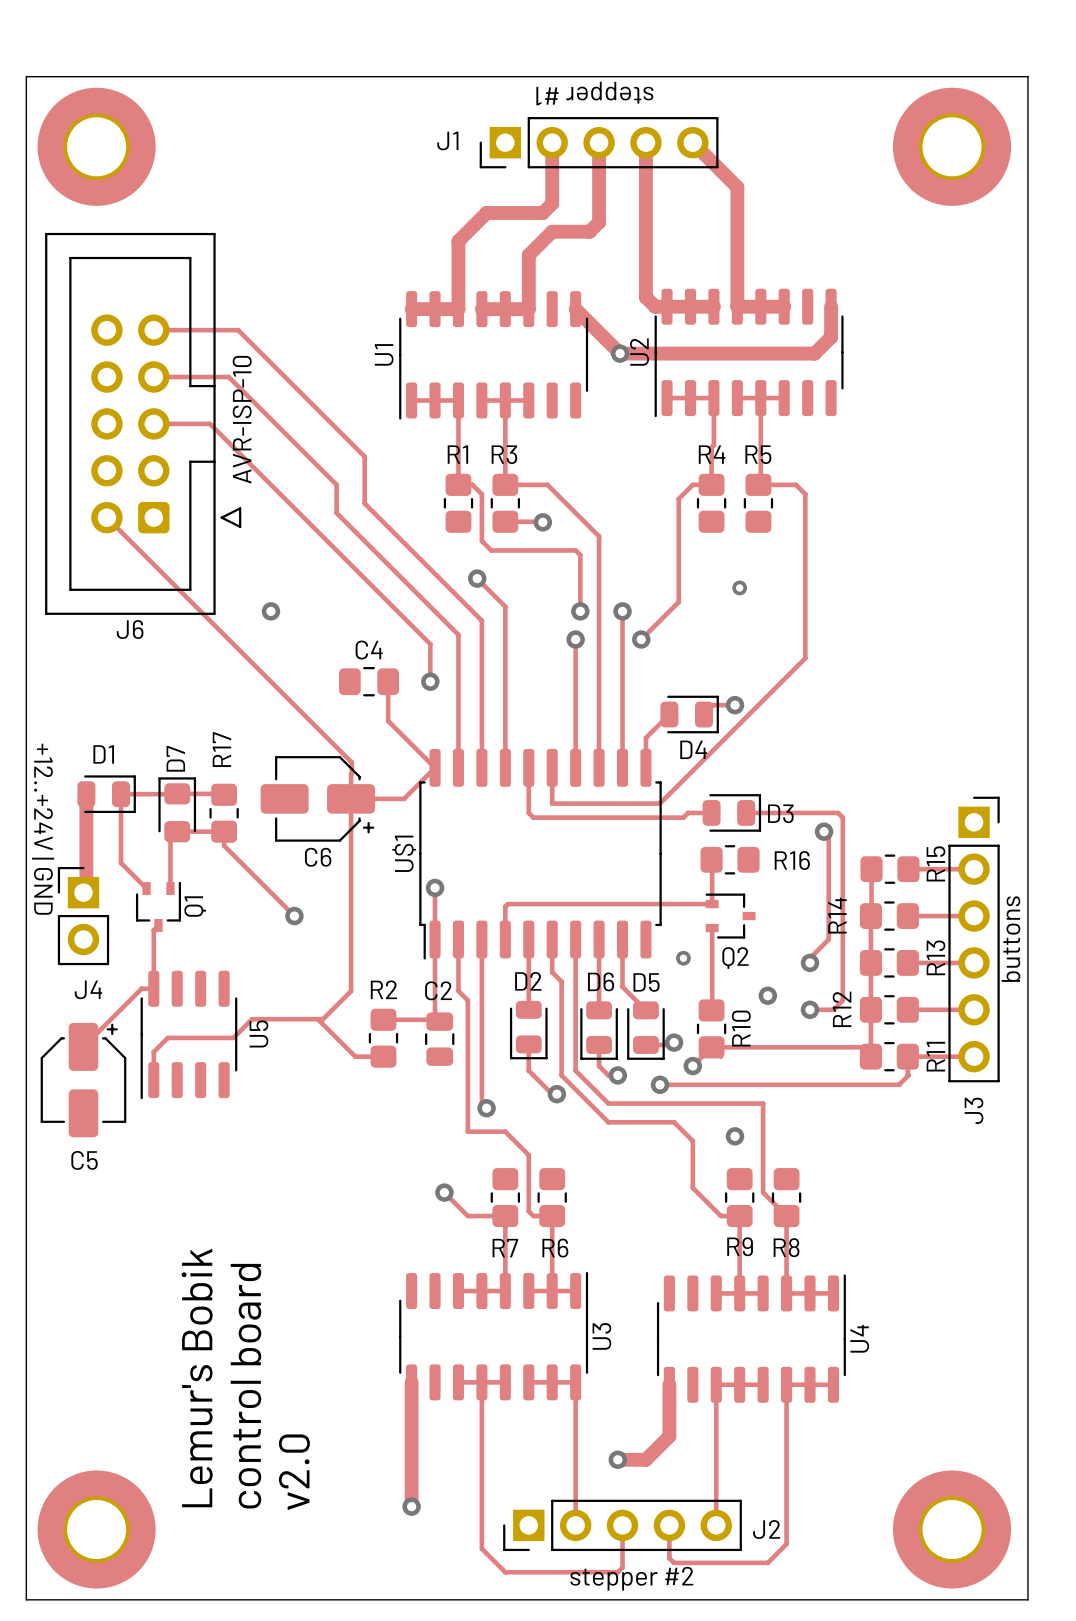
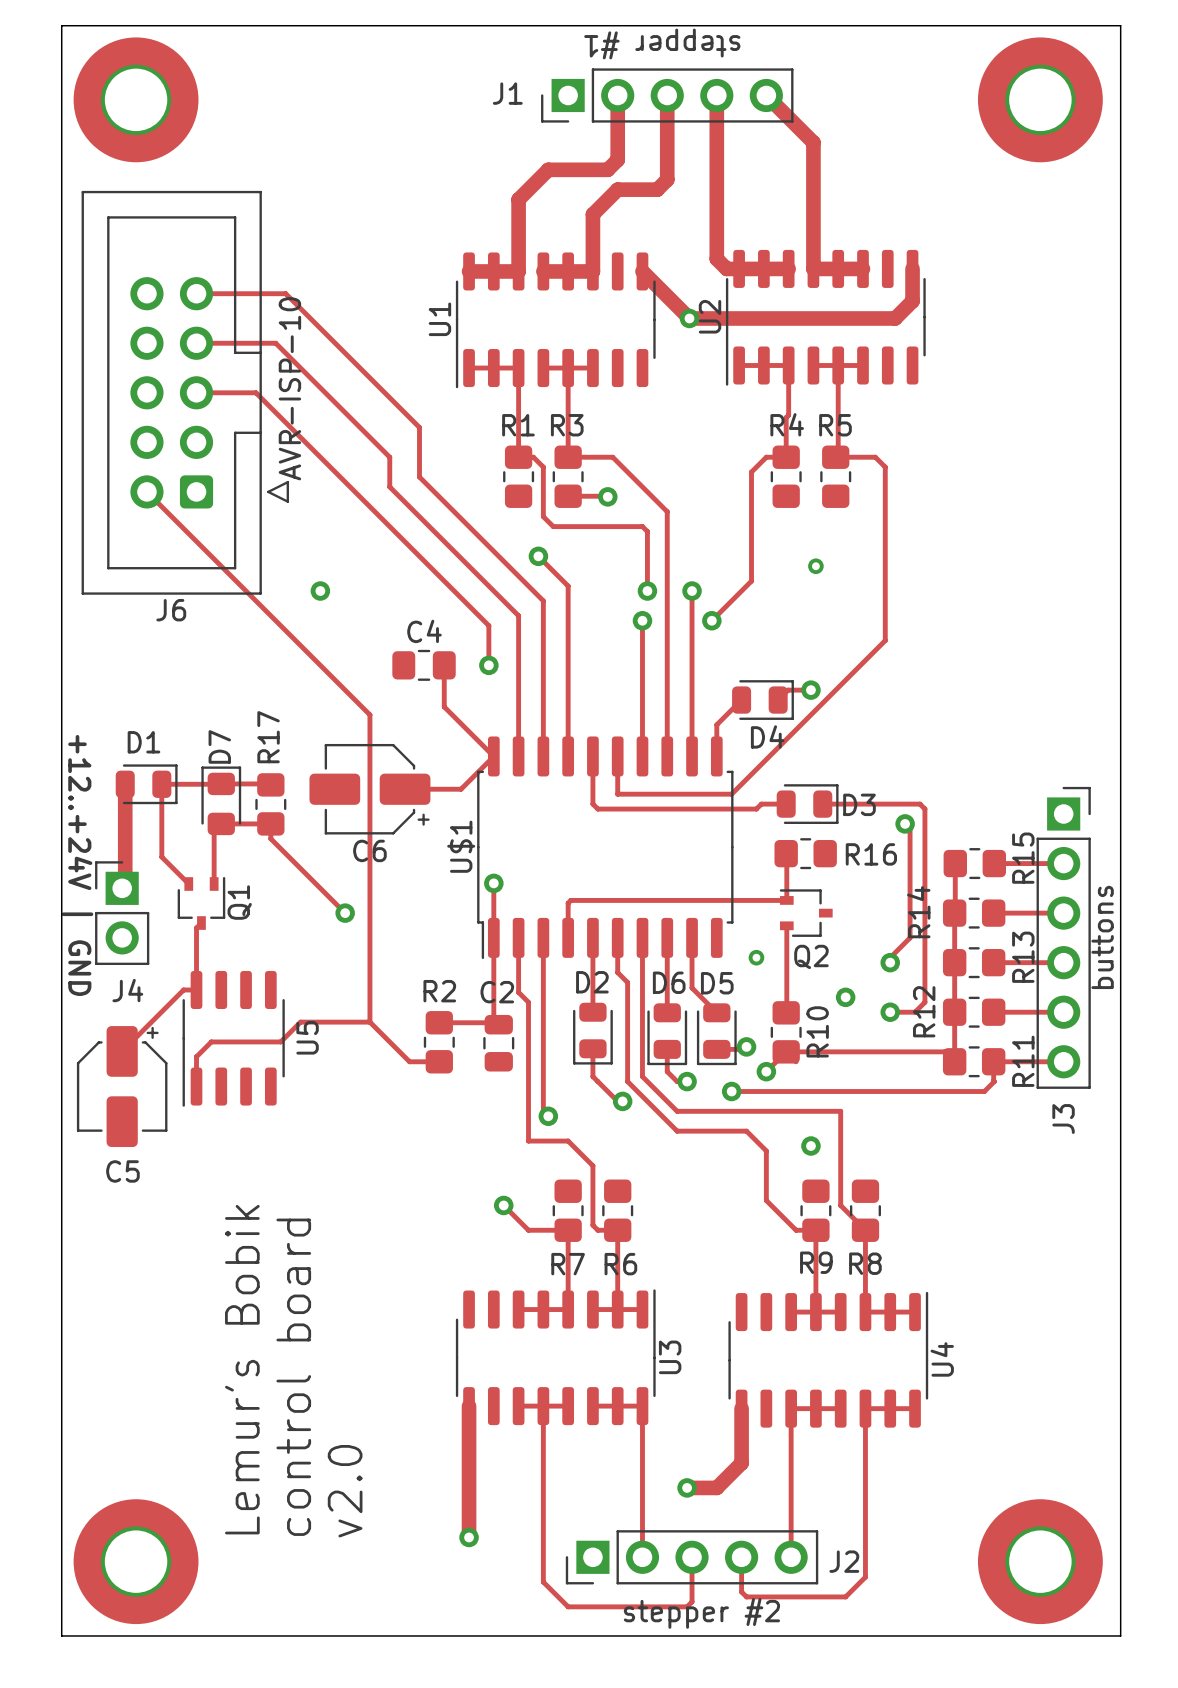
track: (317, 728) (351, 762) (351, 991) (323, 1019) (317, 1019) -> (369, 714) (369, 1022)

